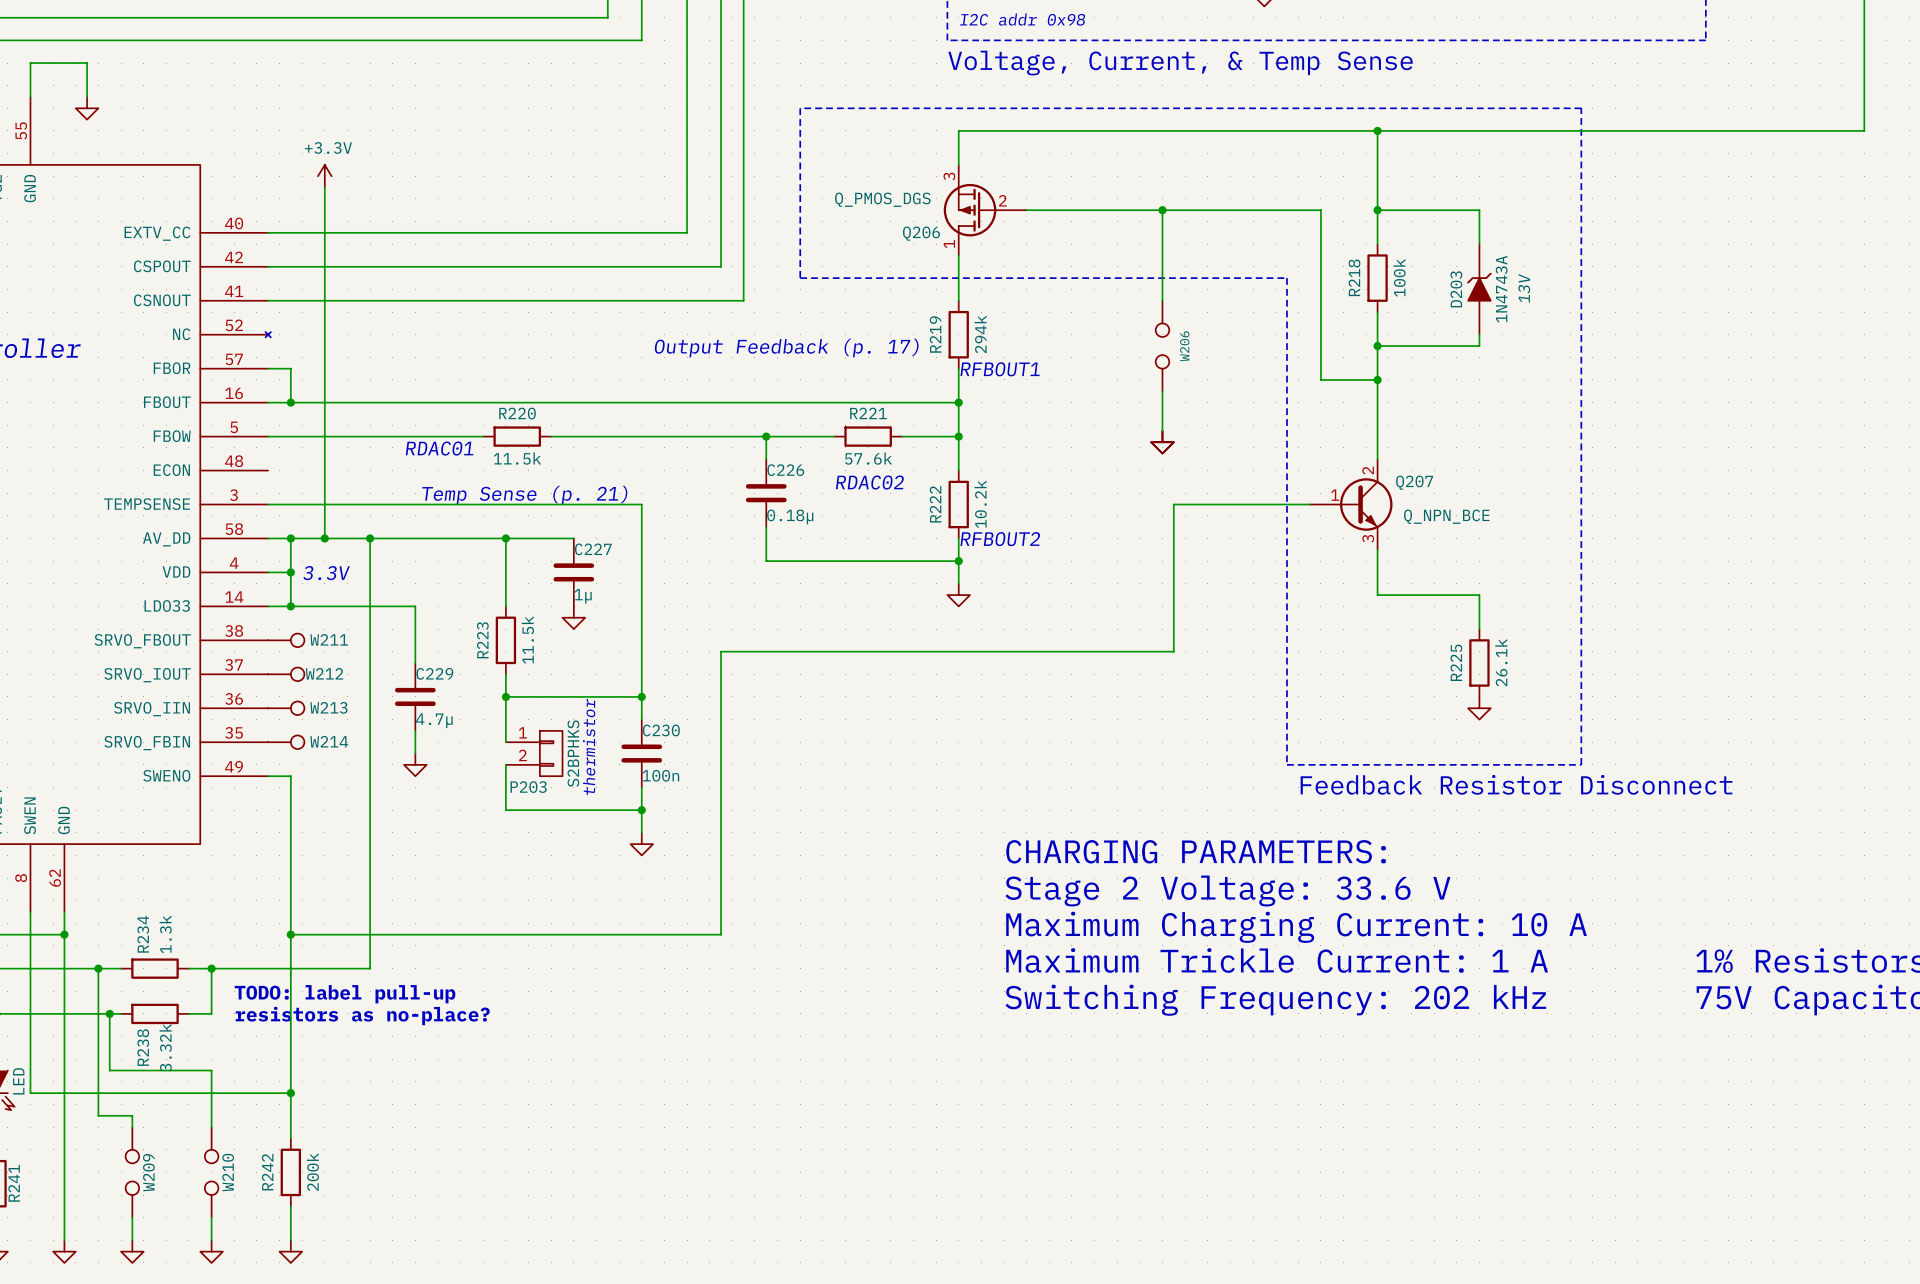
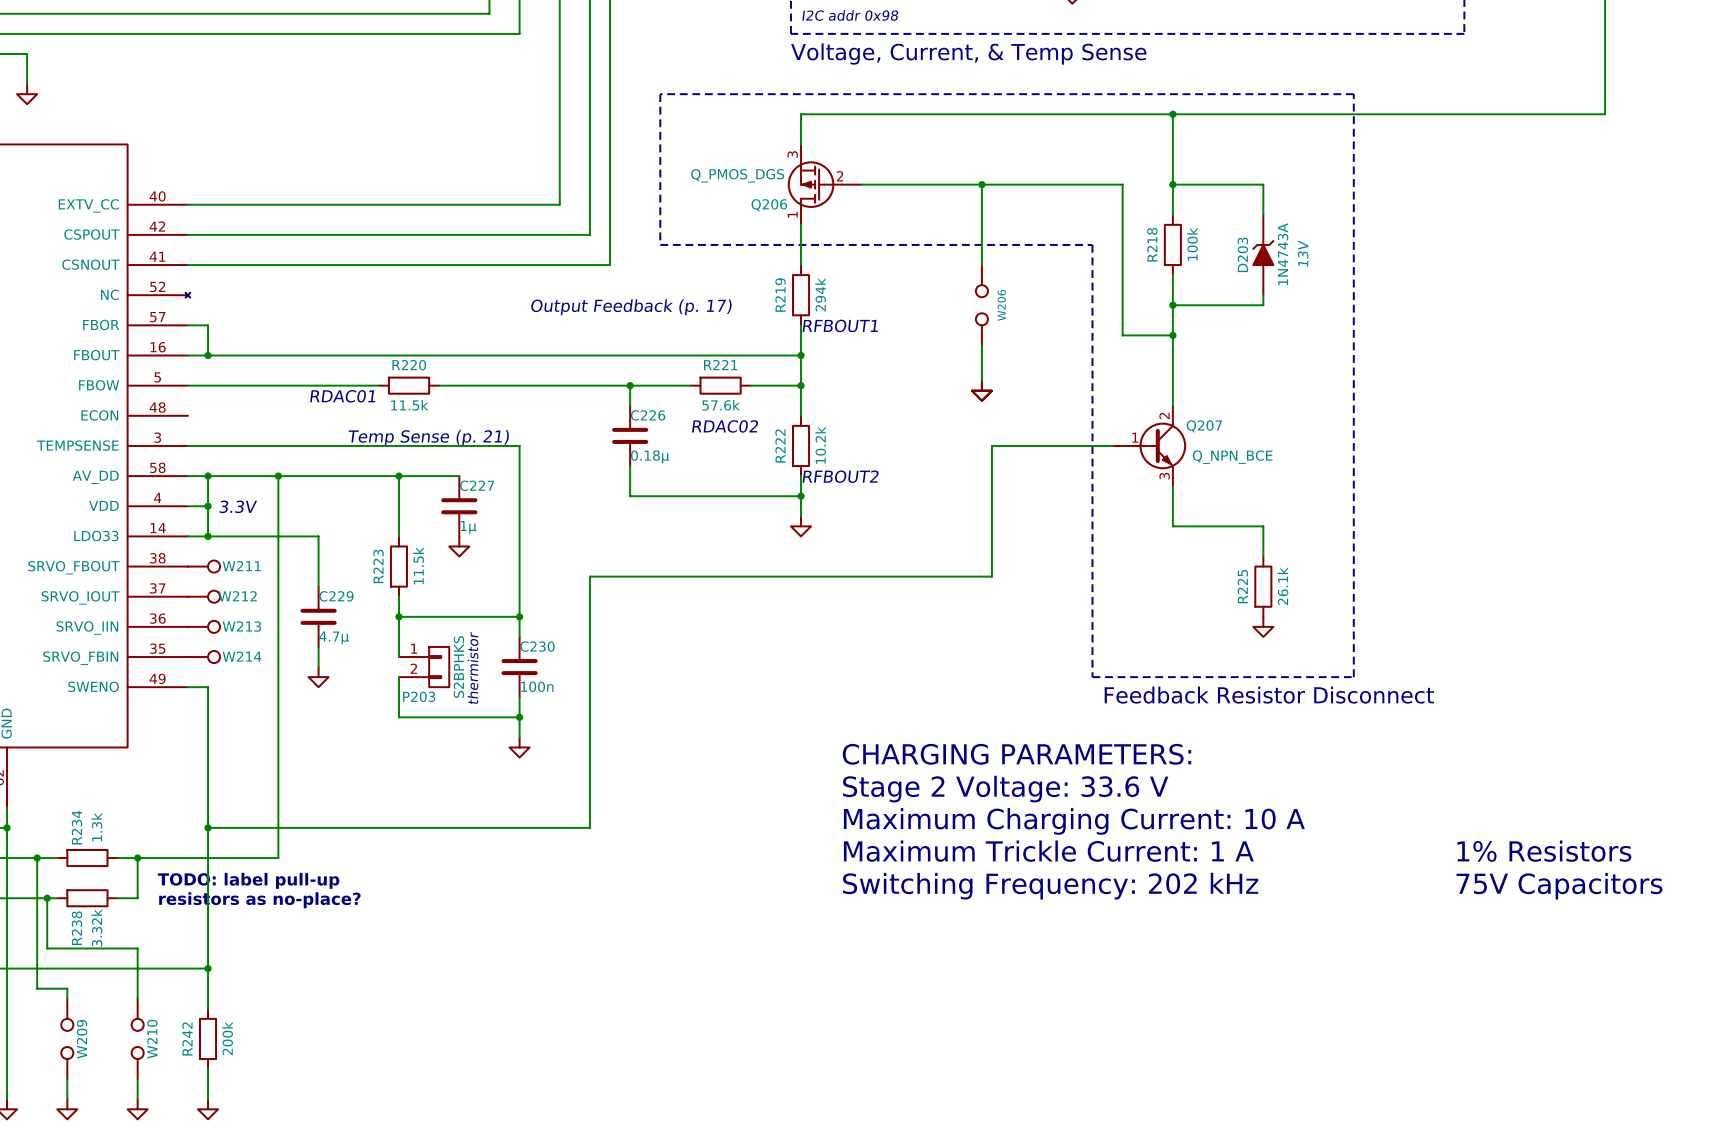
power symbol: +3.3V (324, 176) -> none
wire: (324, 187) (324, 538) -> none
junction: (324, 538) -> none

